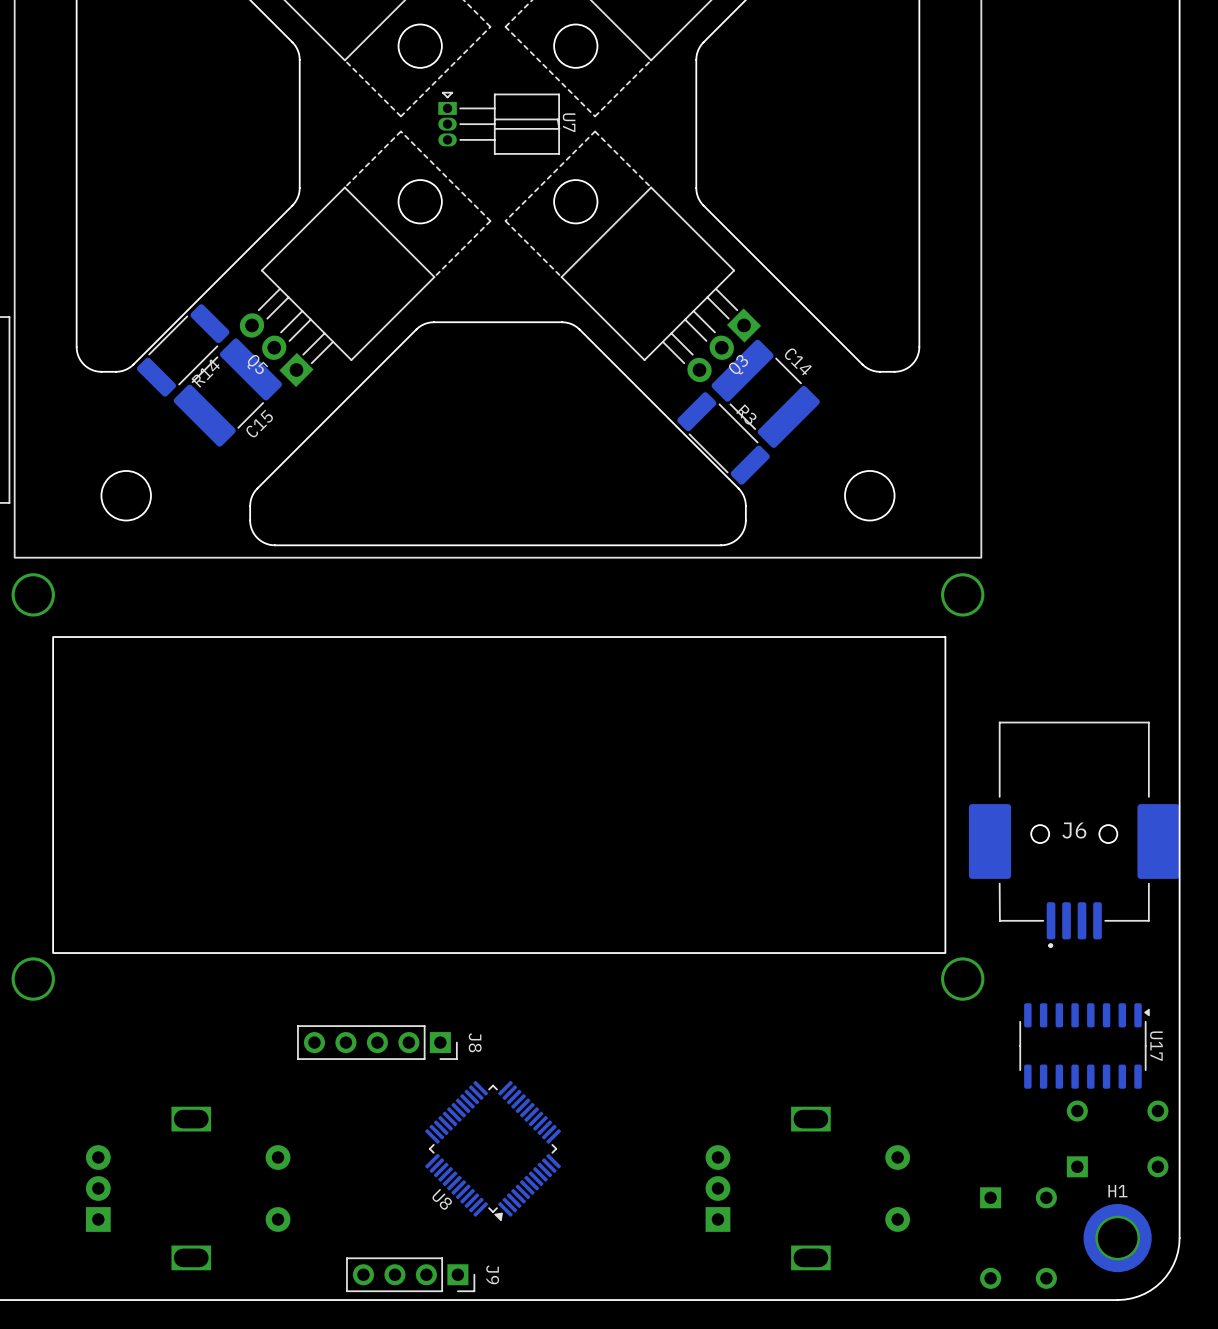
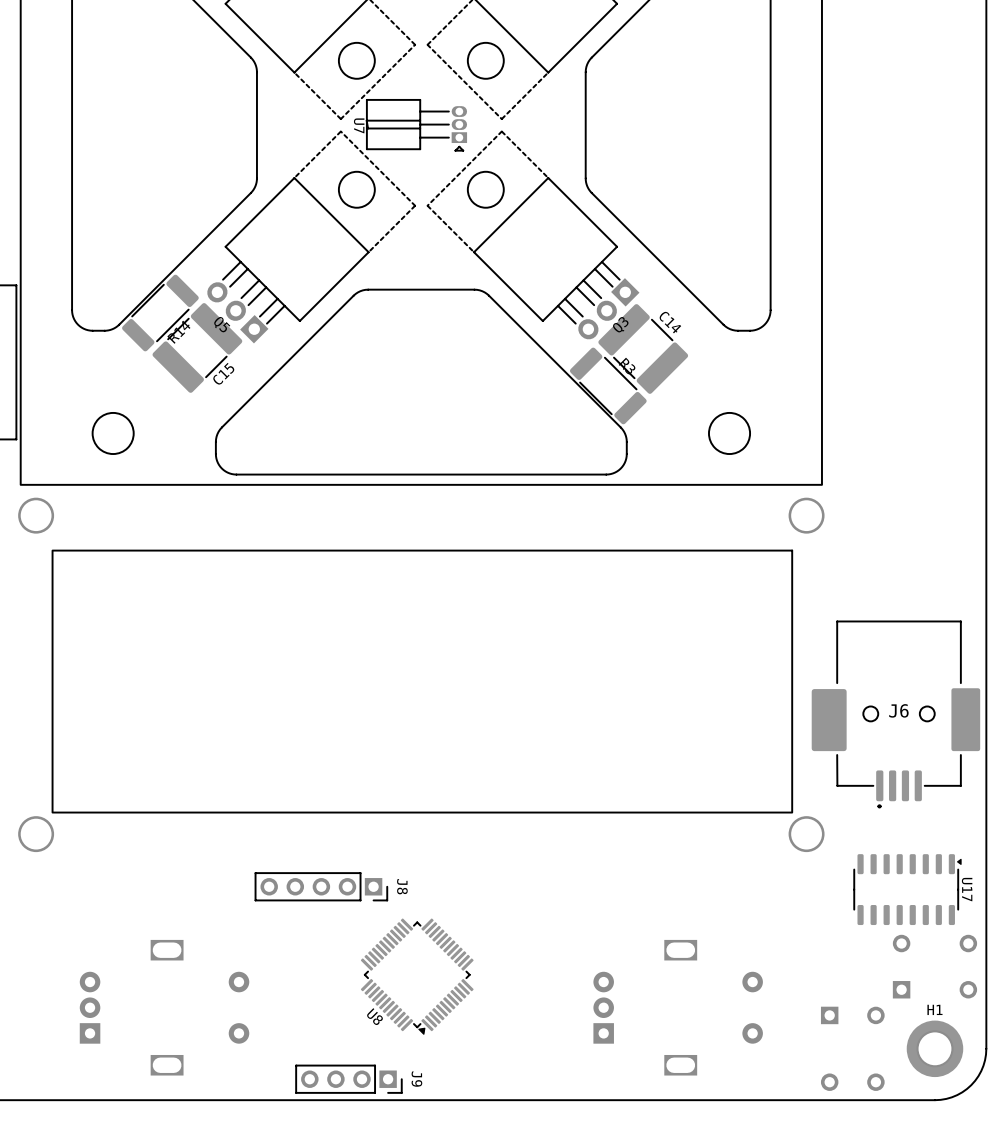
U7 rotation: 0° (499, 123) -> 180° (416, 125)
J6 footprint: [968, 721, 1180, 949] -> [811, 620, 981, 809]

